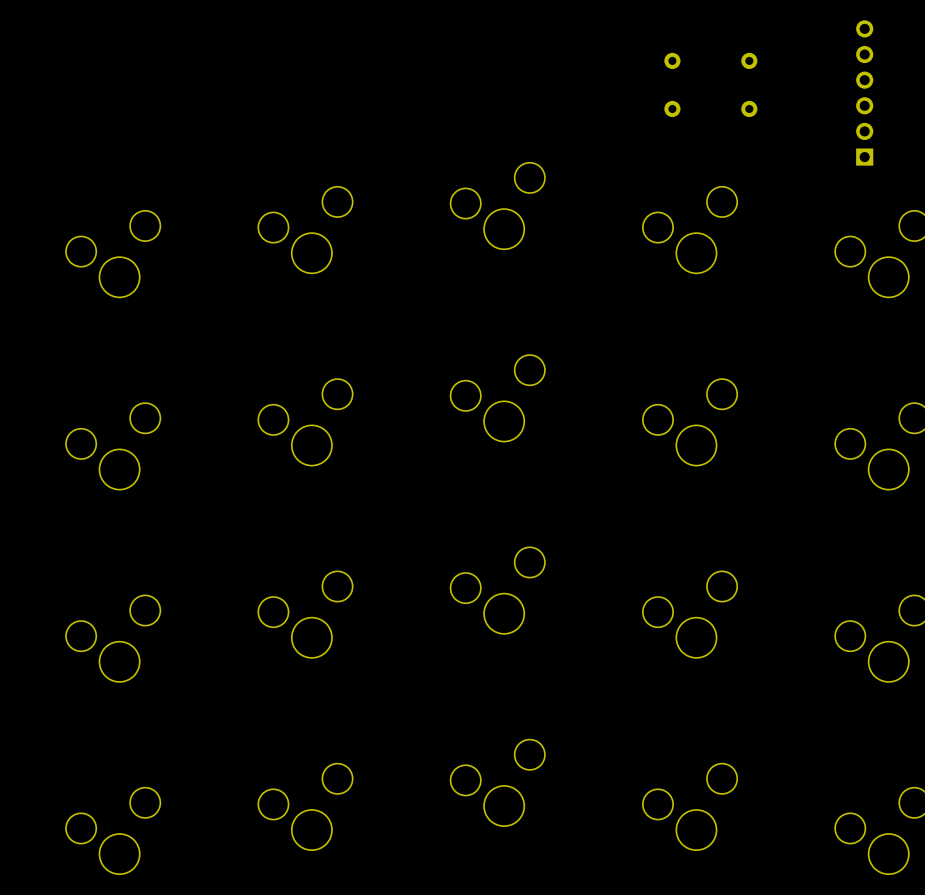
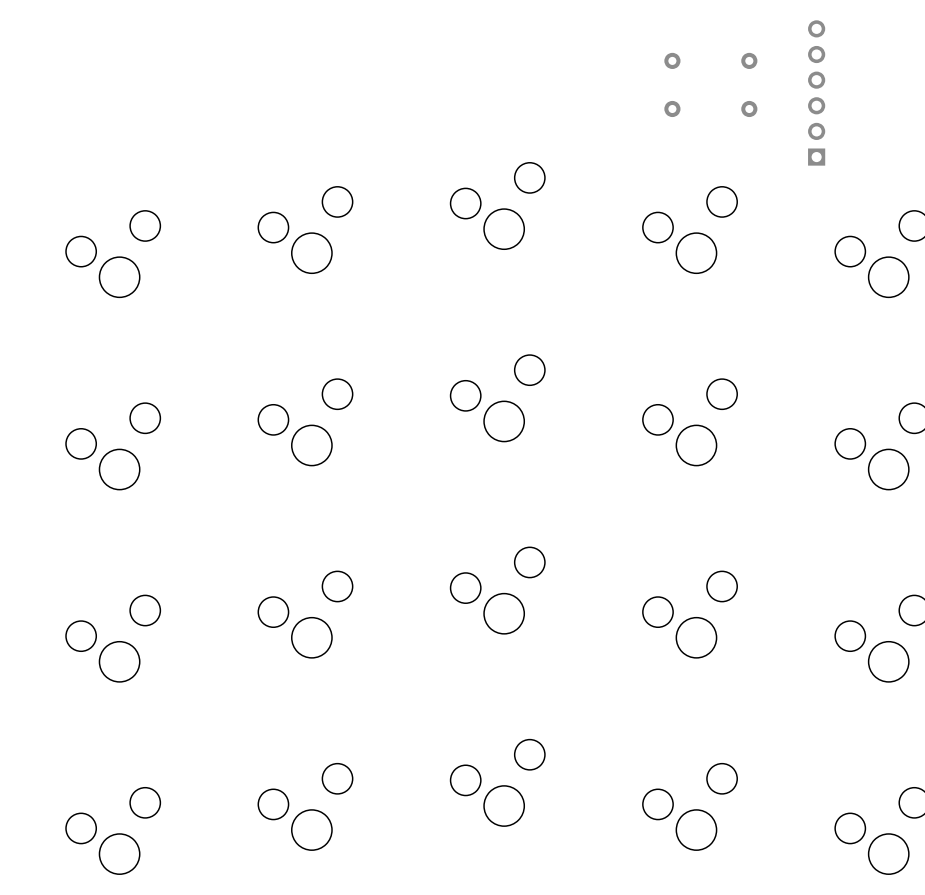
part position: (864, 92) -> (816, 92)

